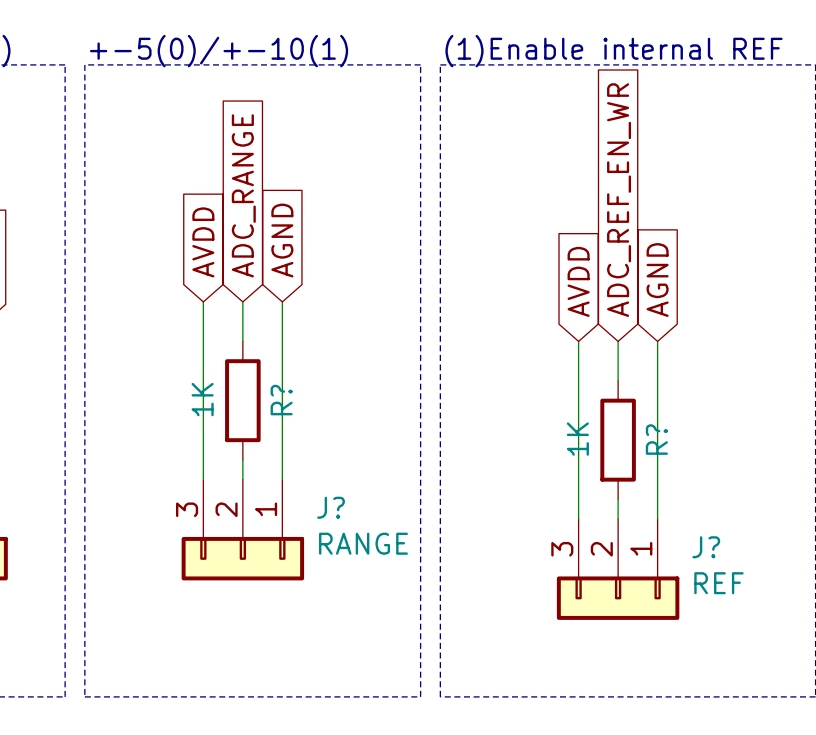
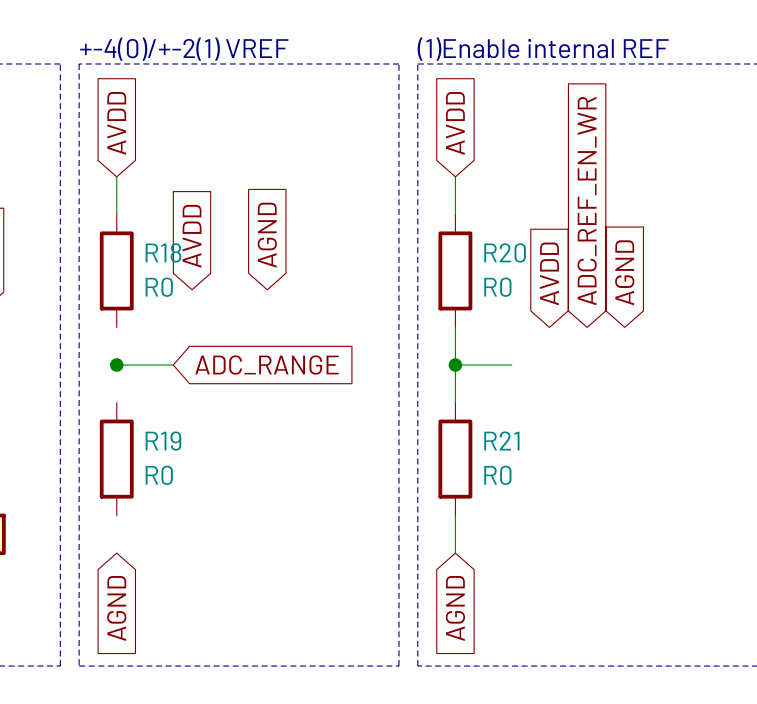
text: +-5(0)/+-10(1) (219, 51) -> +-4(0)/+-2(1) VREF (184, 49)
global label: none -> AVDD (116, 123)
global label: none -> AVDD (455, 123)
global label rotation: 0° (243, 195) -> 90° clockwise (266, 365)
R18: none -> R0 (116, 270)
R20: none -> R0 (455, 270)
wire: (203, 301) (203, 479) -> none
wire: (242, 301) (242, 341) -> (116, 176) (116, 214)
wire: (282, 301) (282, 479) -> none
wire: none -> (455, 327) (455, 402)
wire: (578, 341) (578, 519) -> none
wire: (618, 341) (618, 380) -> (455, 176) (455, 214)
wire: (657, 341) (657, 519) -> none
wire: none -> (116, 365) (173, 365)
junction: none -> (116, 365)
wire: none -> (455, 365) (511, 365)
junction: none -> (455, 365)
R?: 1K (242, 400) -> none
R?: 1K (618, 440) -> none
wire: (242, 459) (242, 479) -> none
R19: none -> R0 (116, 459)
R21: none -> R0 (455, 459)
wire: (618, 499) (618, 519) -> none
J?: RANGE (242, 530) -> none
wire: none -> (455, 515) (455, 553)
J?: REF (618, 569) -> none
global label: none -> AGND (116, 608)
global label: none -> AGND (455, 608)

